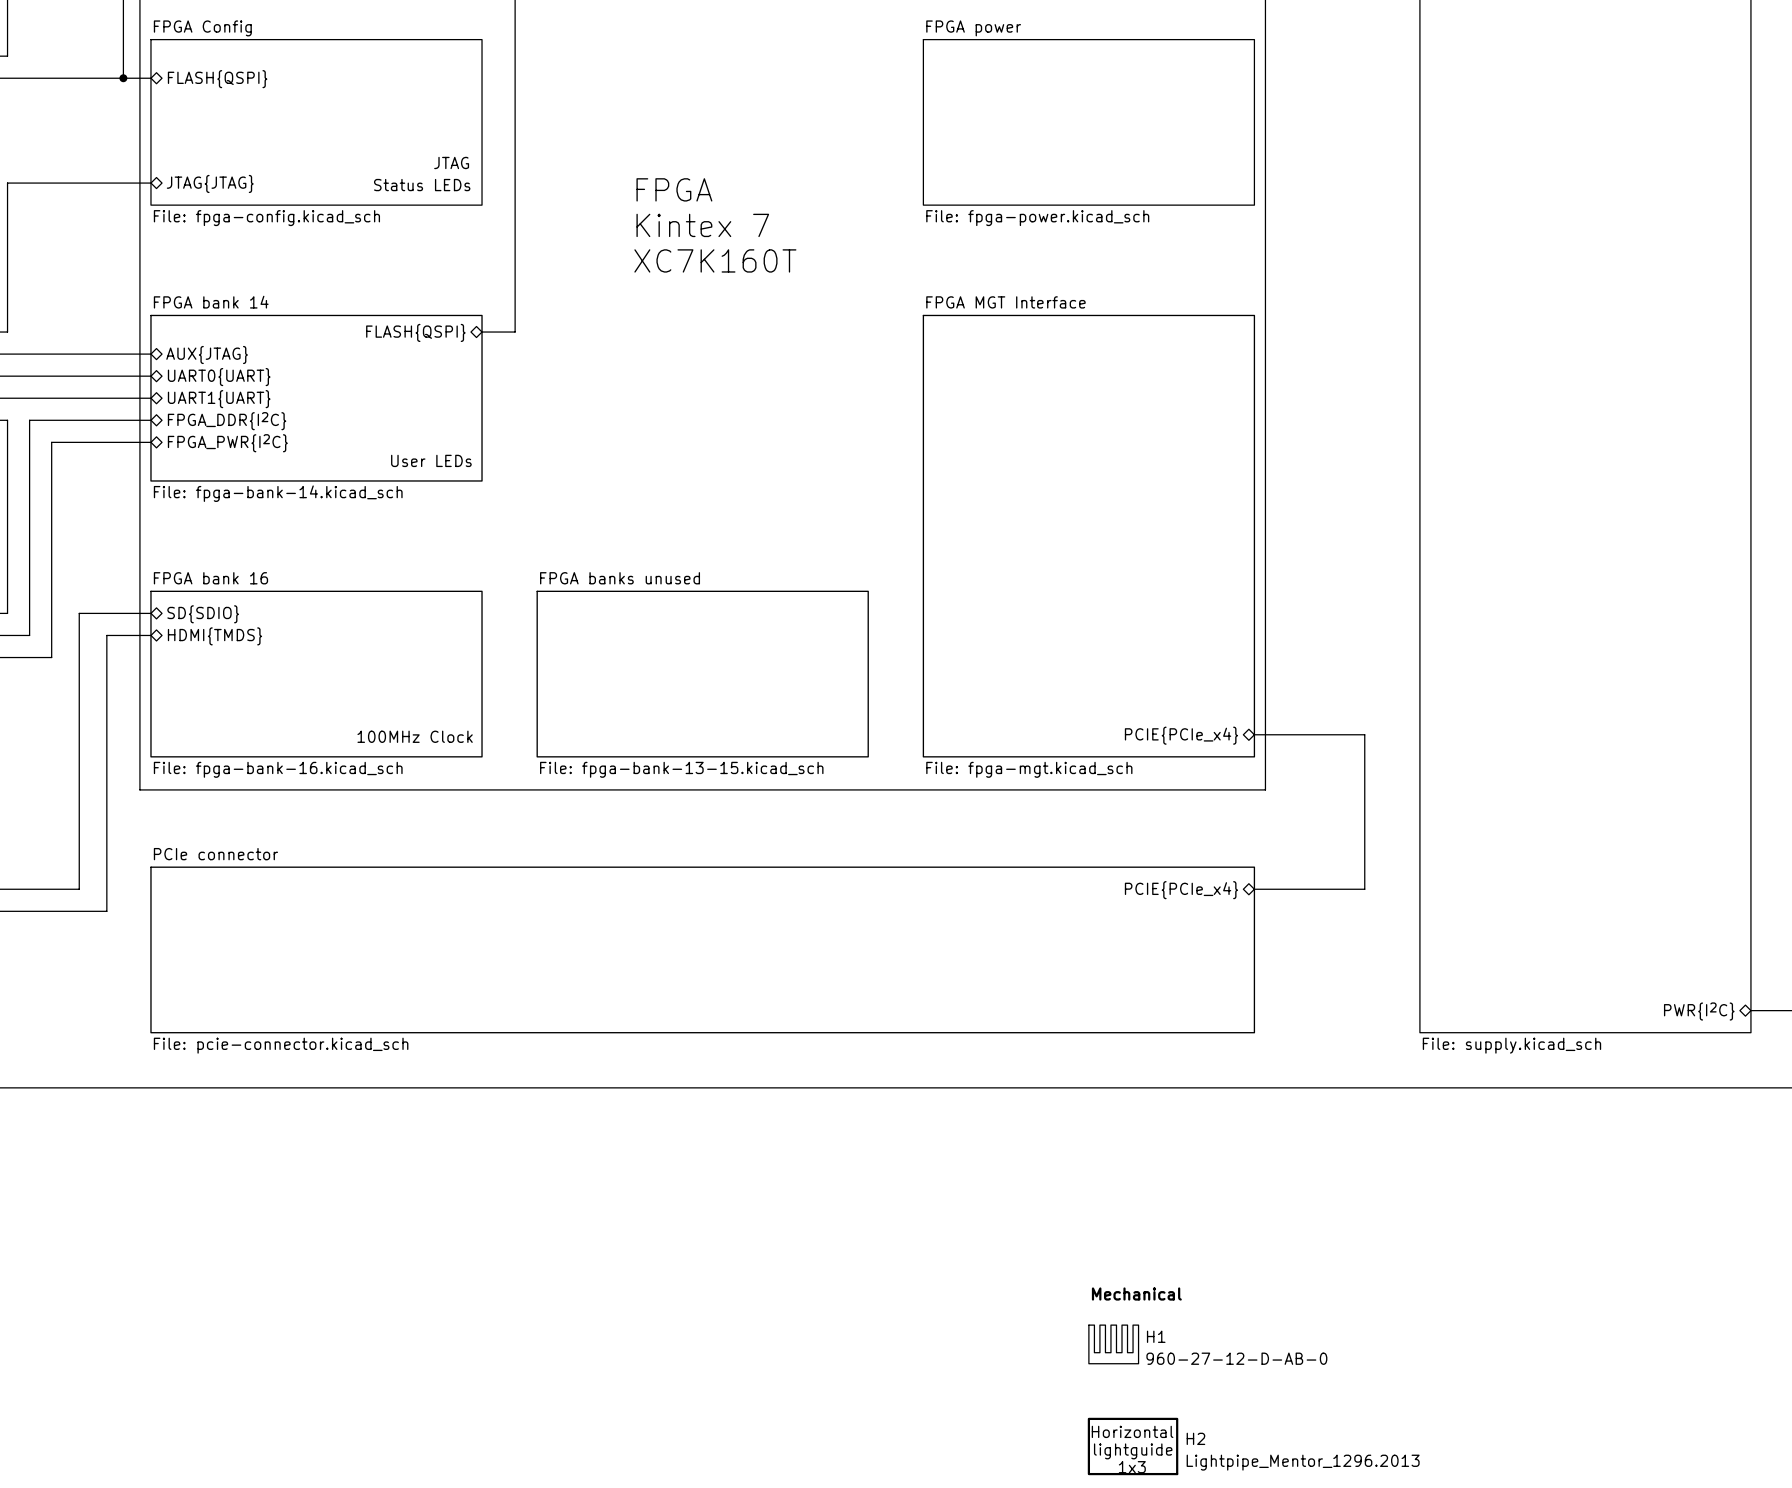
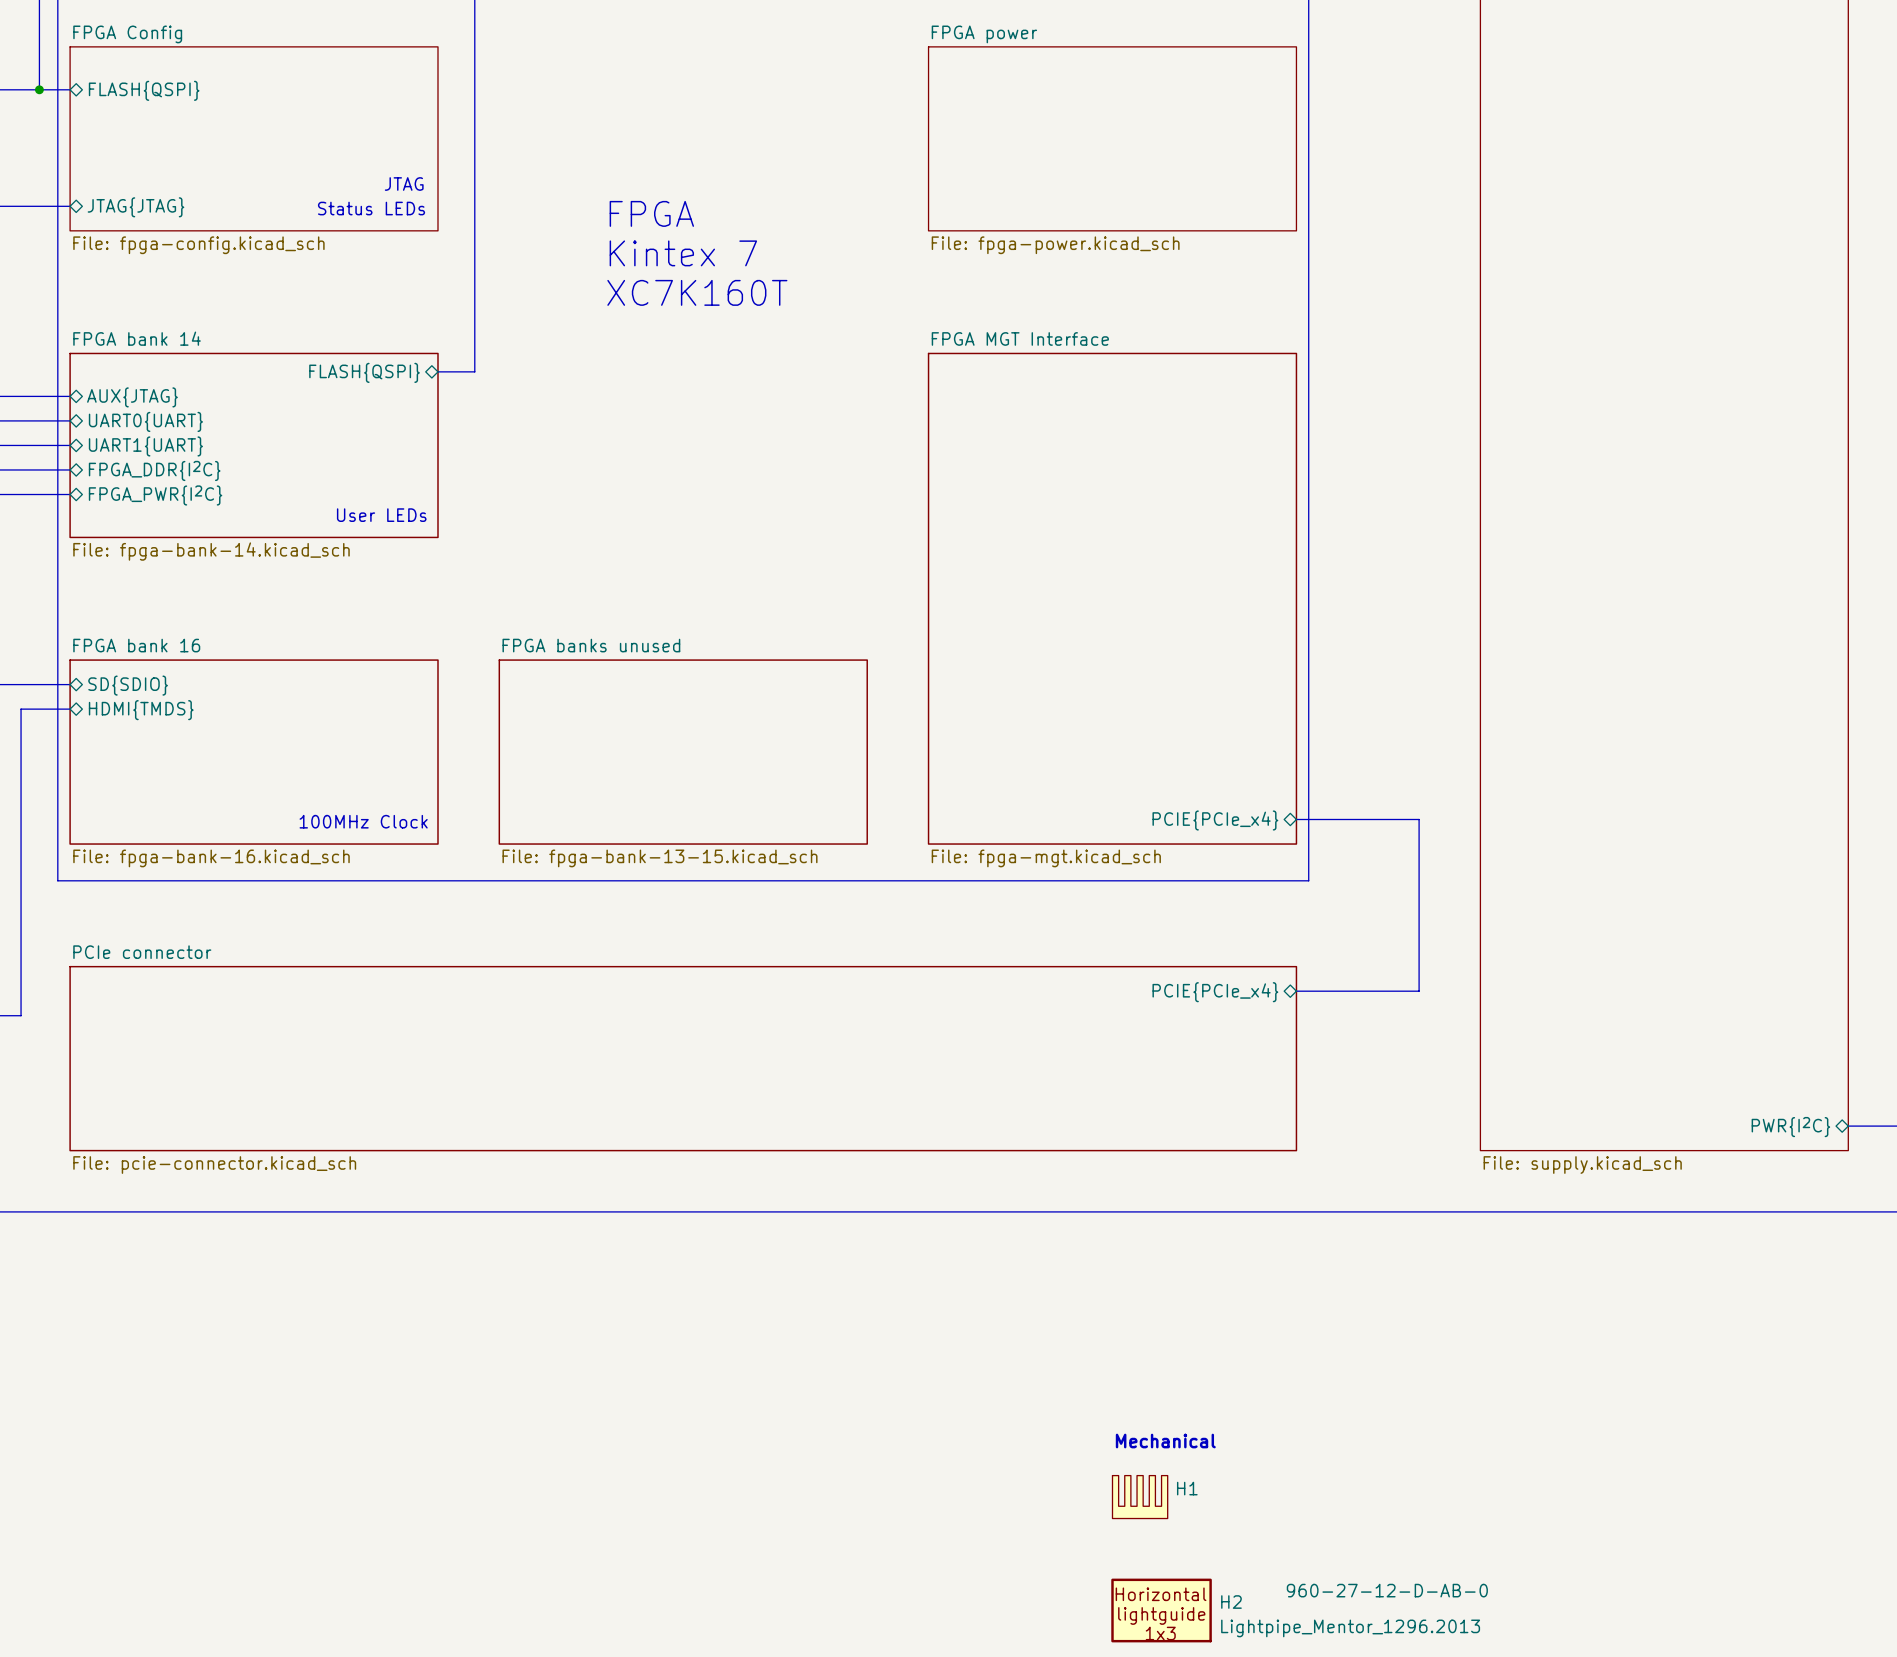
H1 text position: 960-27-12-D-AB-0 (1236, 1358) -> 960-27-12-D-AB-0 (1387, 1590)

